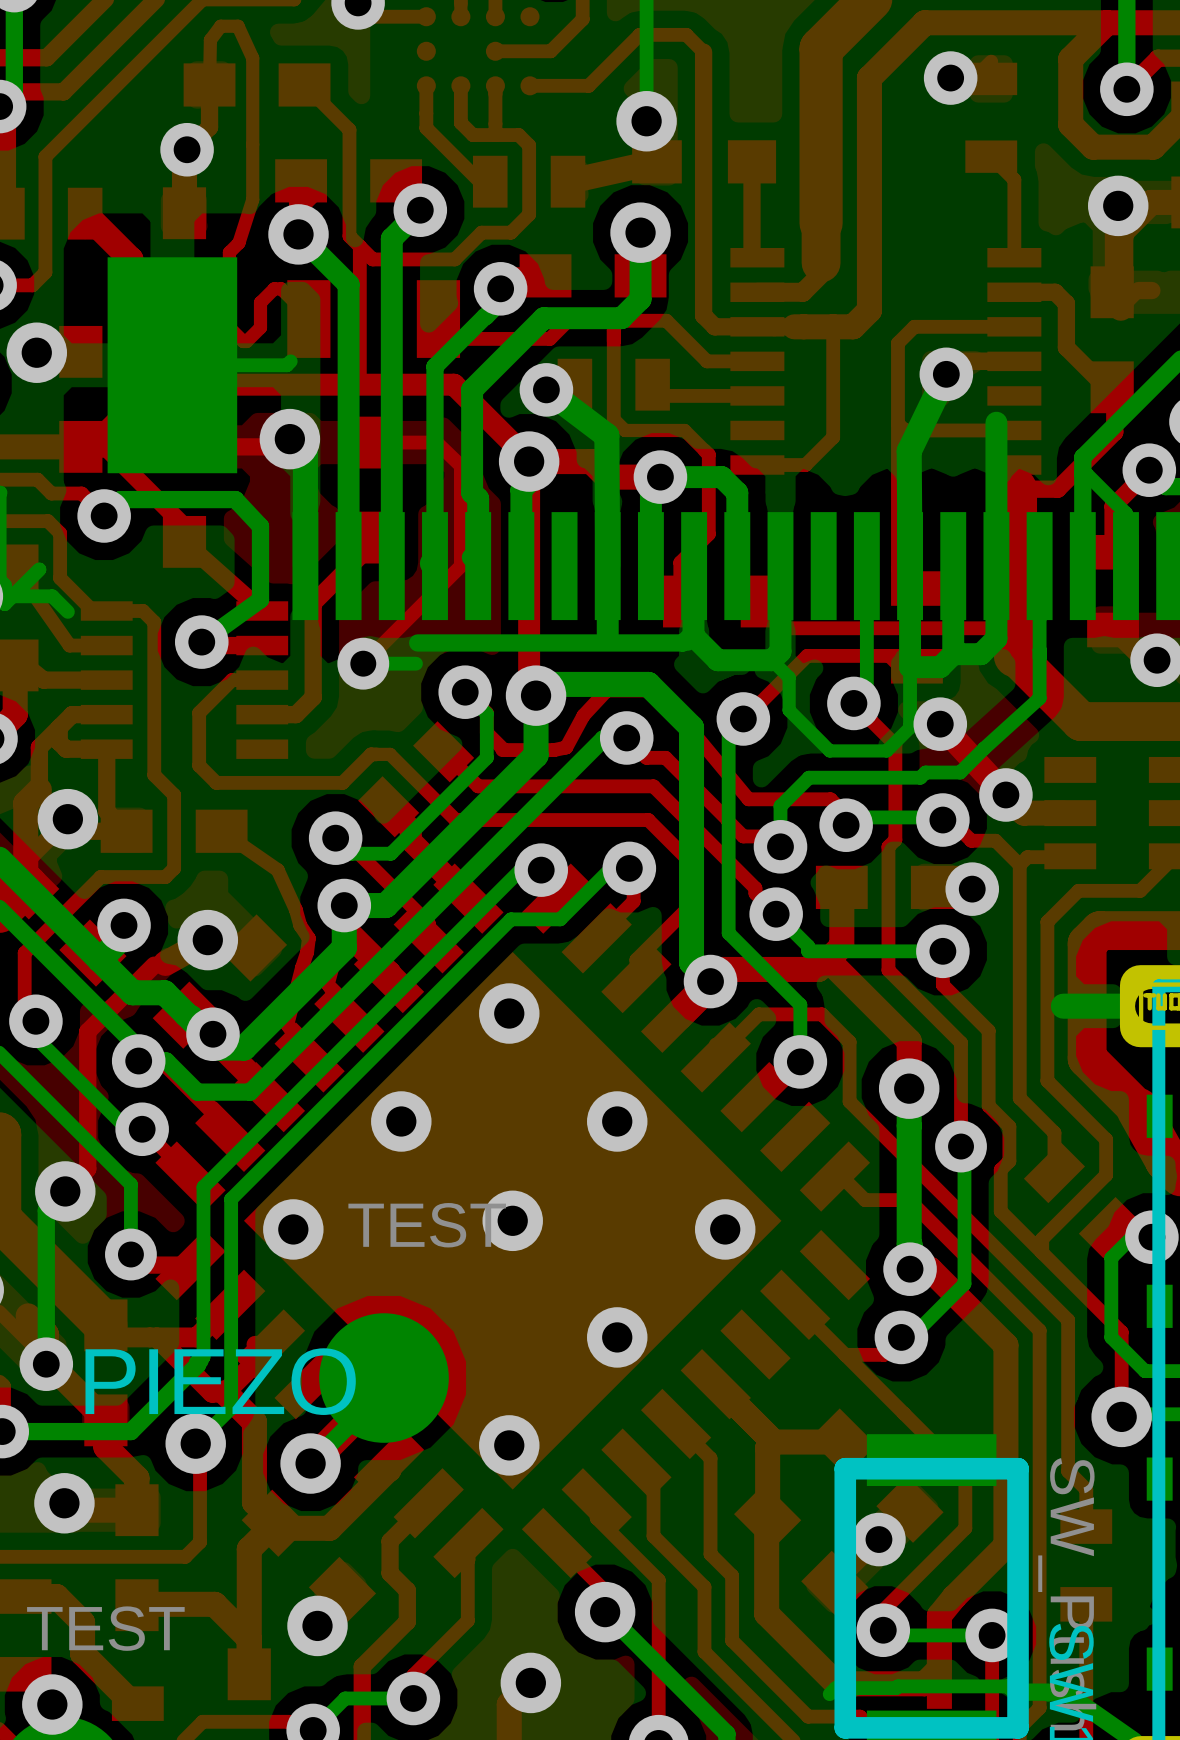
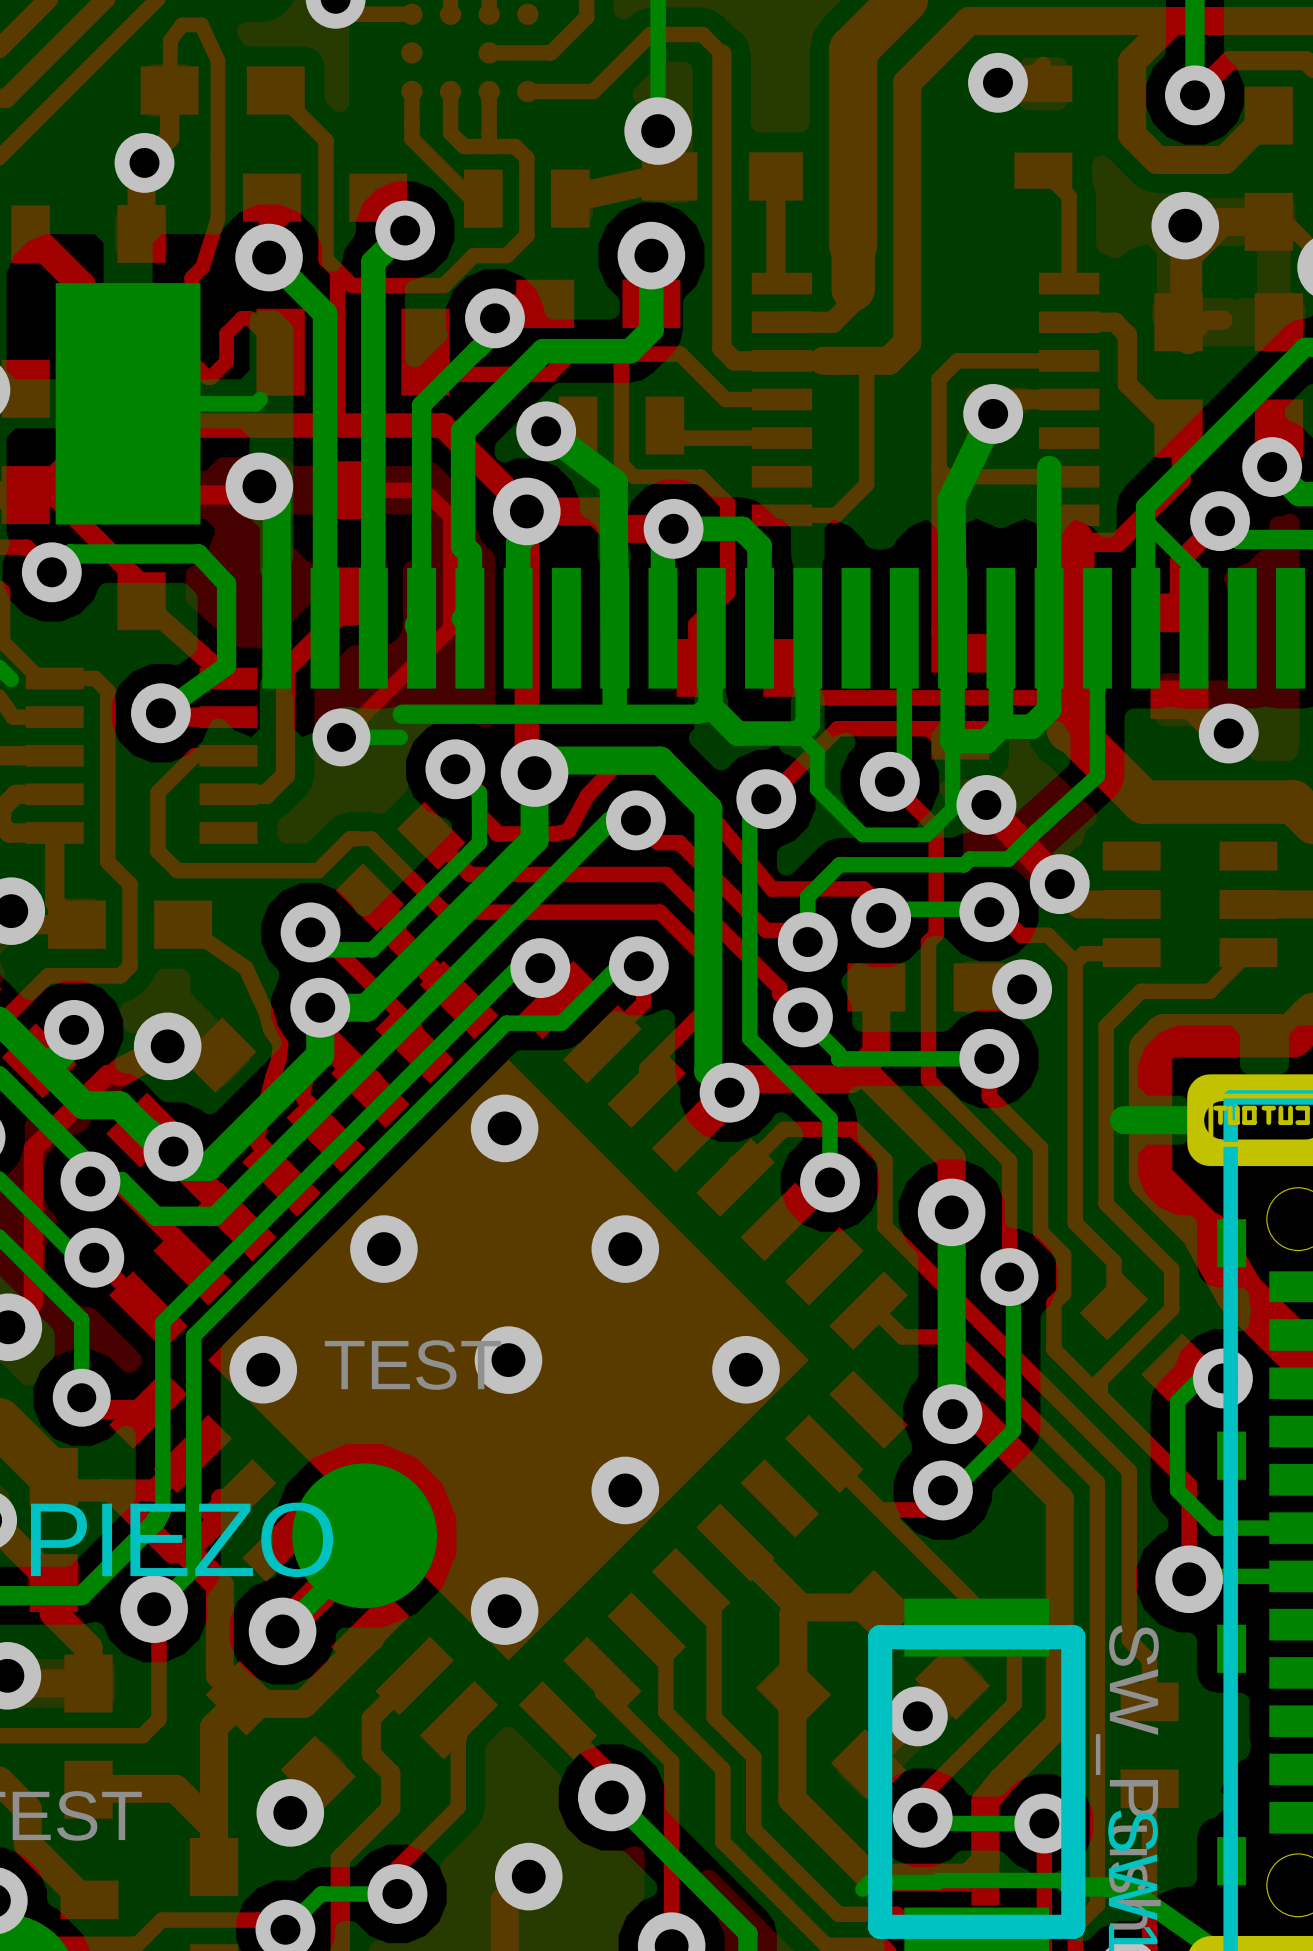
top track: (696, 1444) (710, 1458) (710, 1554) -> (714, 1610) (714, 1717) (729, 1732)

